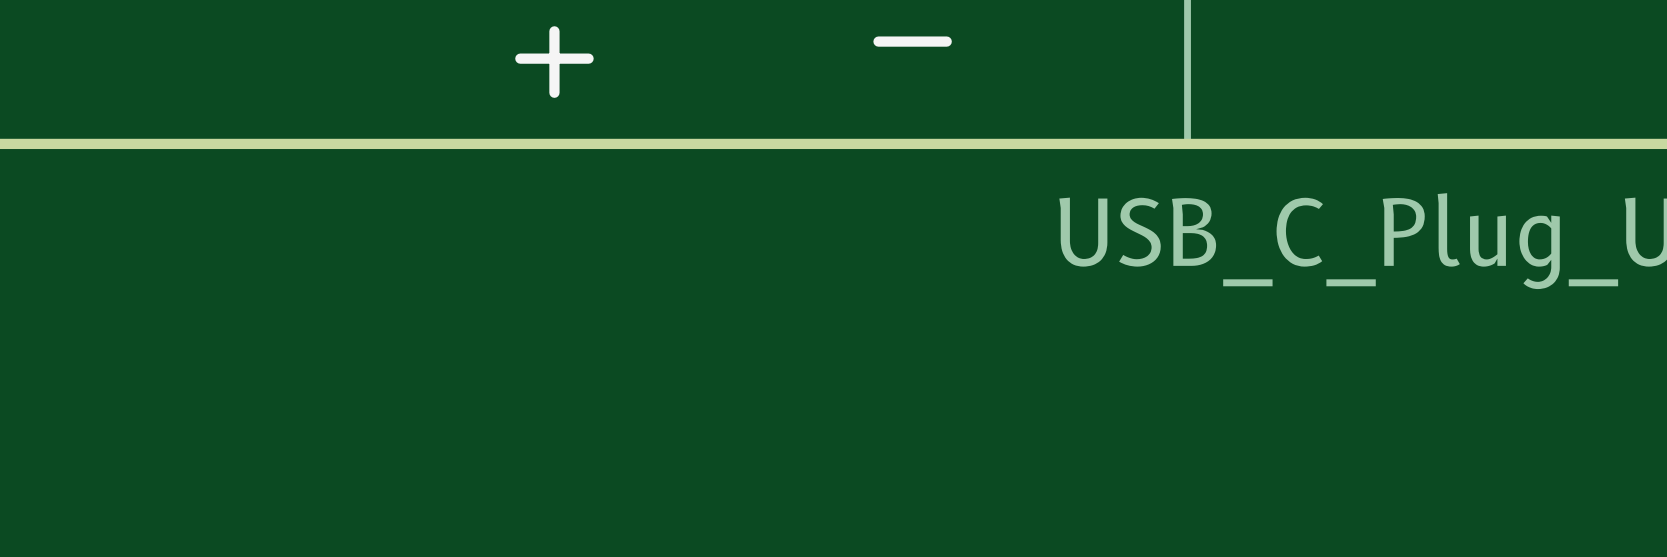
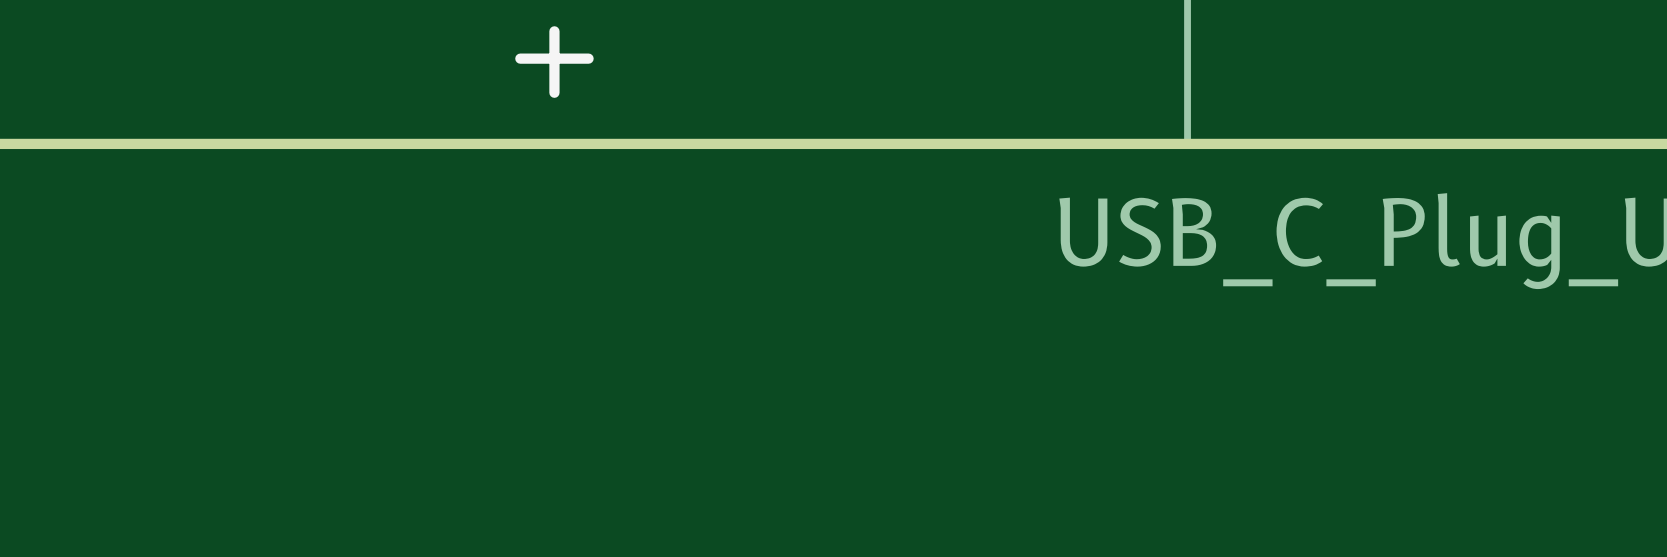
line: (878, 41) (946, 41) -> none

